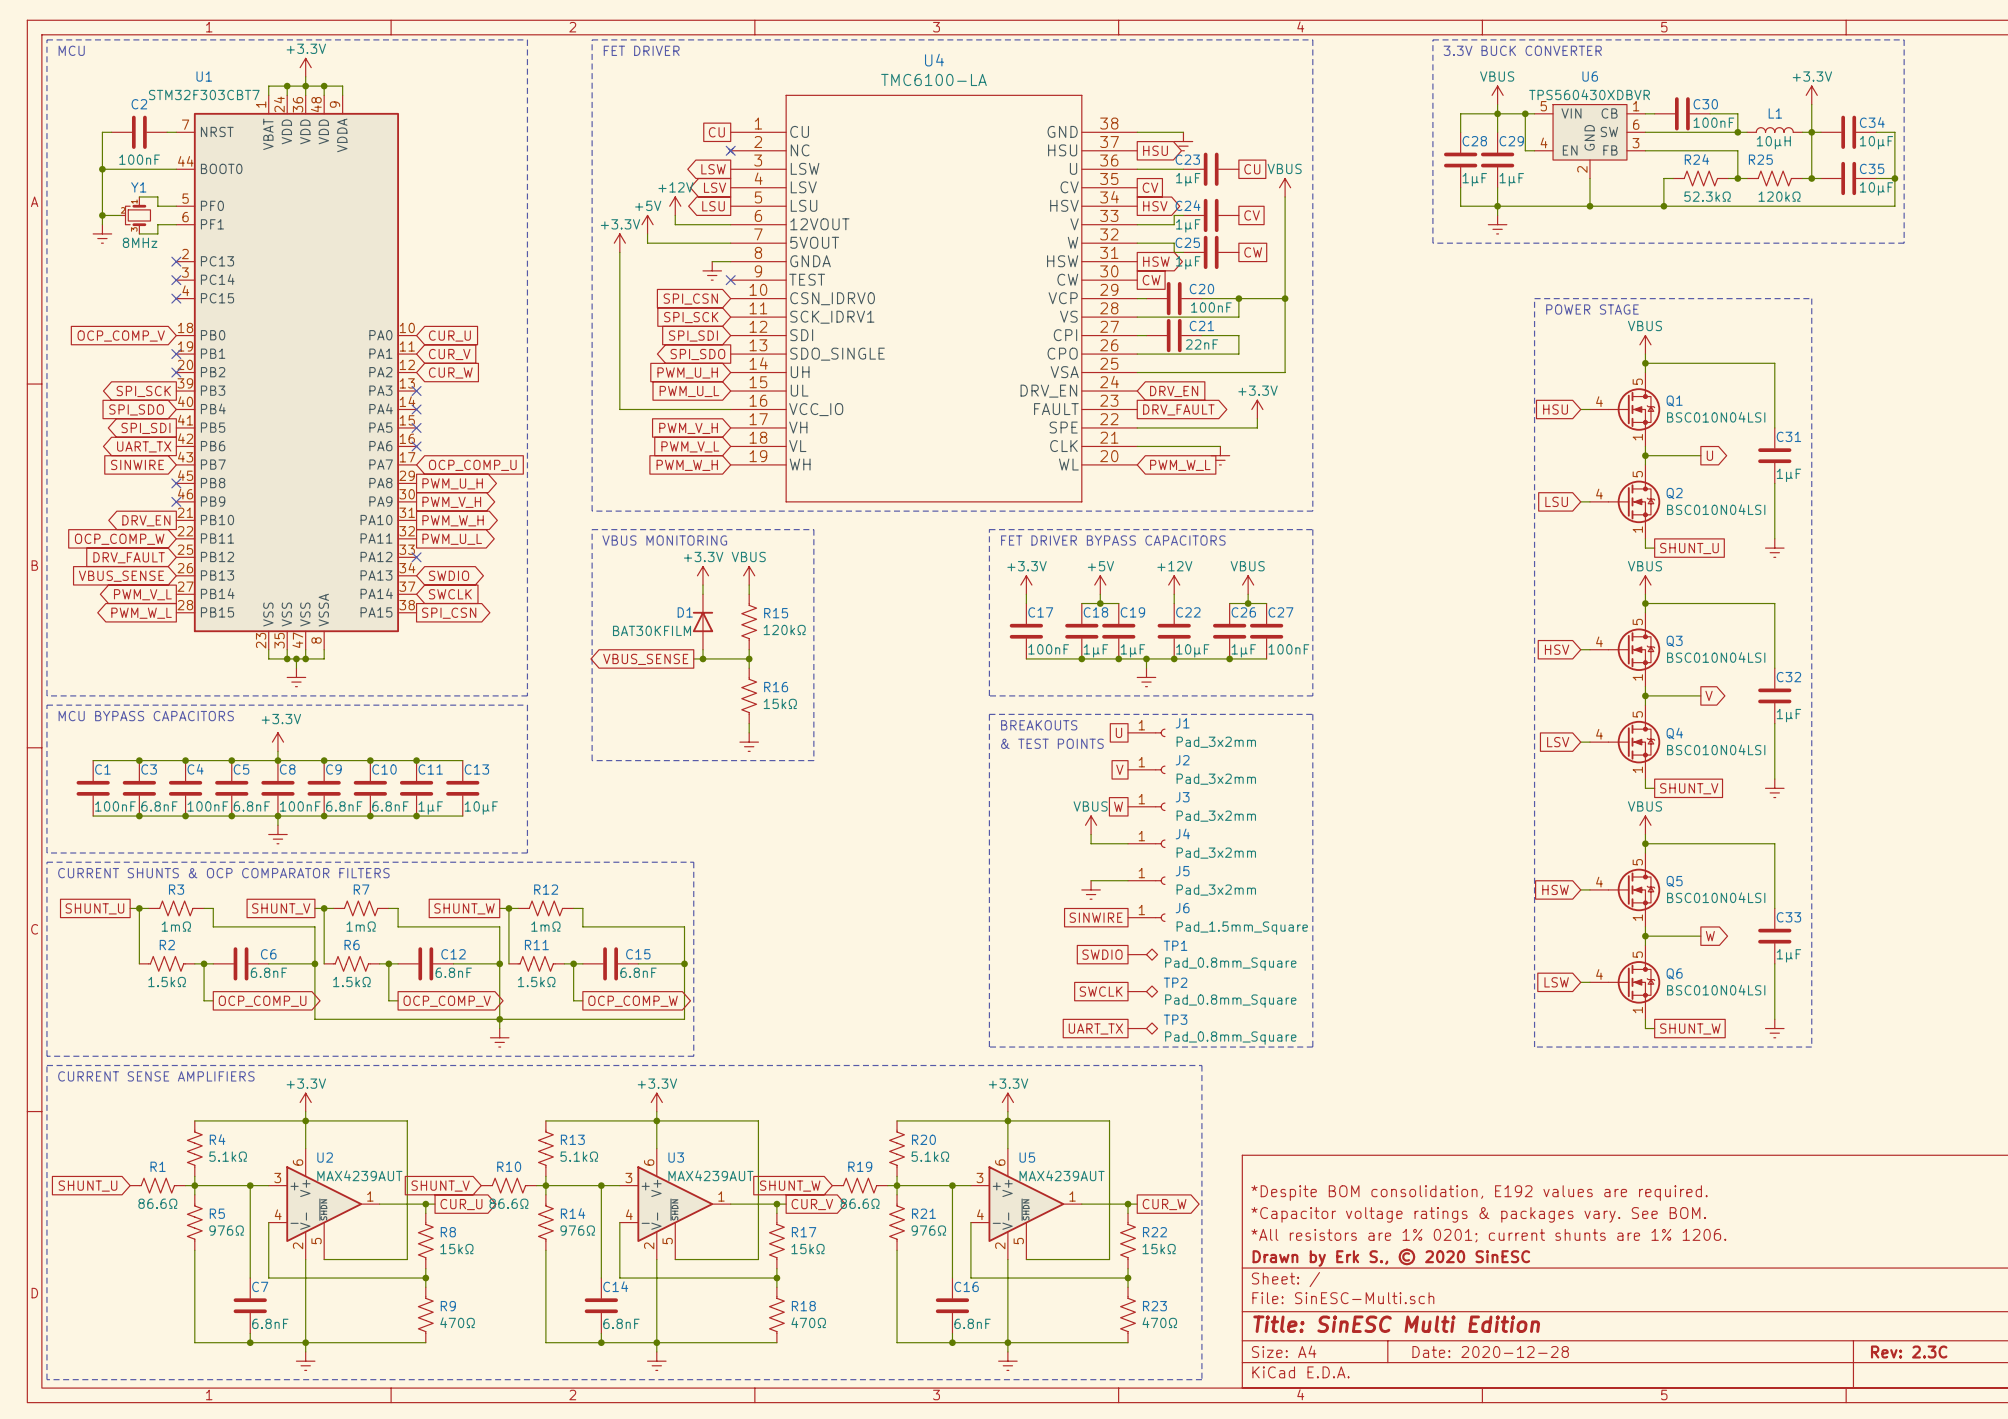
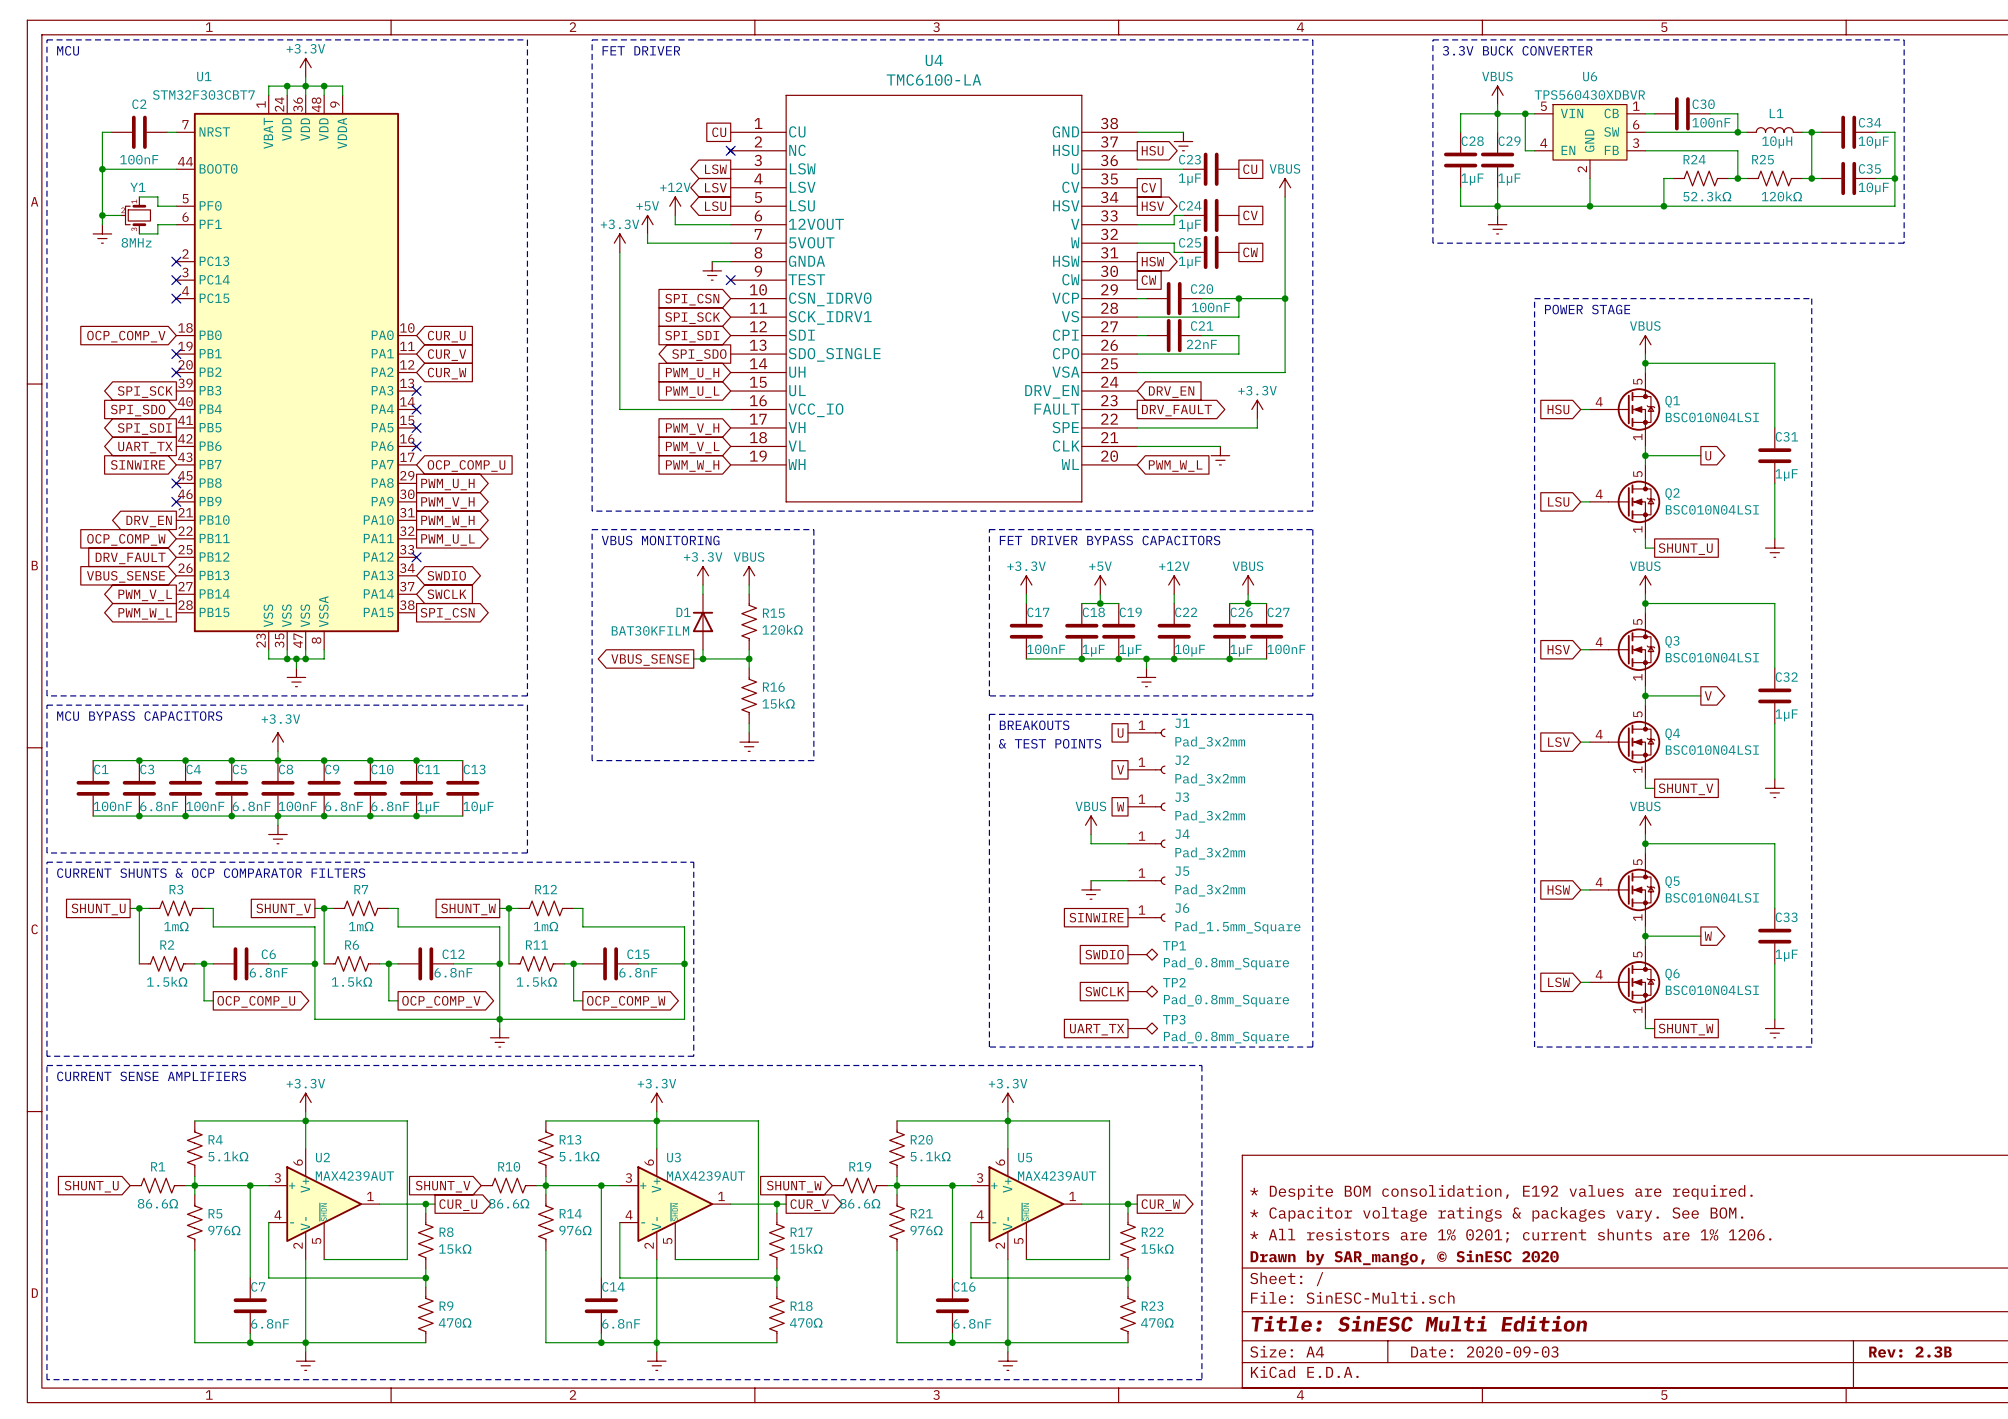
power symbol: +3.3V (1811, 95) -> none
wire: (1811, 104) (1811, 132) -> none
title block: *Despite BOM consolidation, E192 values are required. (1479, 1193) -> * Despite BOM consolidation, E192 values are required. (1501, 1192)
title block: *Capacitor voltage ratings & packages vary. See BOM. (1478, 1214) -> * Capacitor voltage ratings & packages vary. See BOM. (1496, 1214)
title block: *All resistors are 1% 0201; current shunts are 1% 1206. (1488, 1235) -> * All resistors are 1% 0201; current shunts are 1% 1206. (1510, 1235)
title block: Drawn by Erk S., © 2020 SinESC (1391, 1257) -> Drawn by SAR_mango, © SinESC 2020 (1404, 1257)
title block: Date: 2020-12-28 (1490, 1352) -> Date: 2020-09-03 (1484, 1352)
title block: Rev: 2.3C (1909, 1352) -> Rev: 2.3B (1910, 1352)

